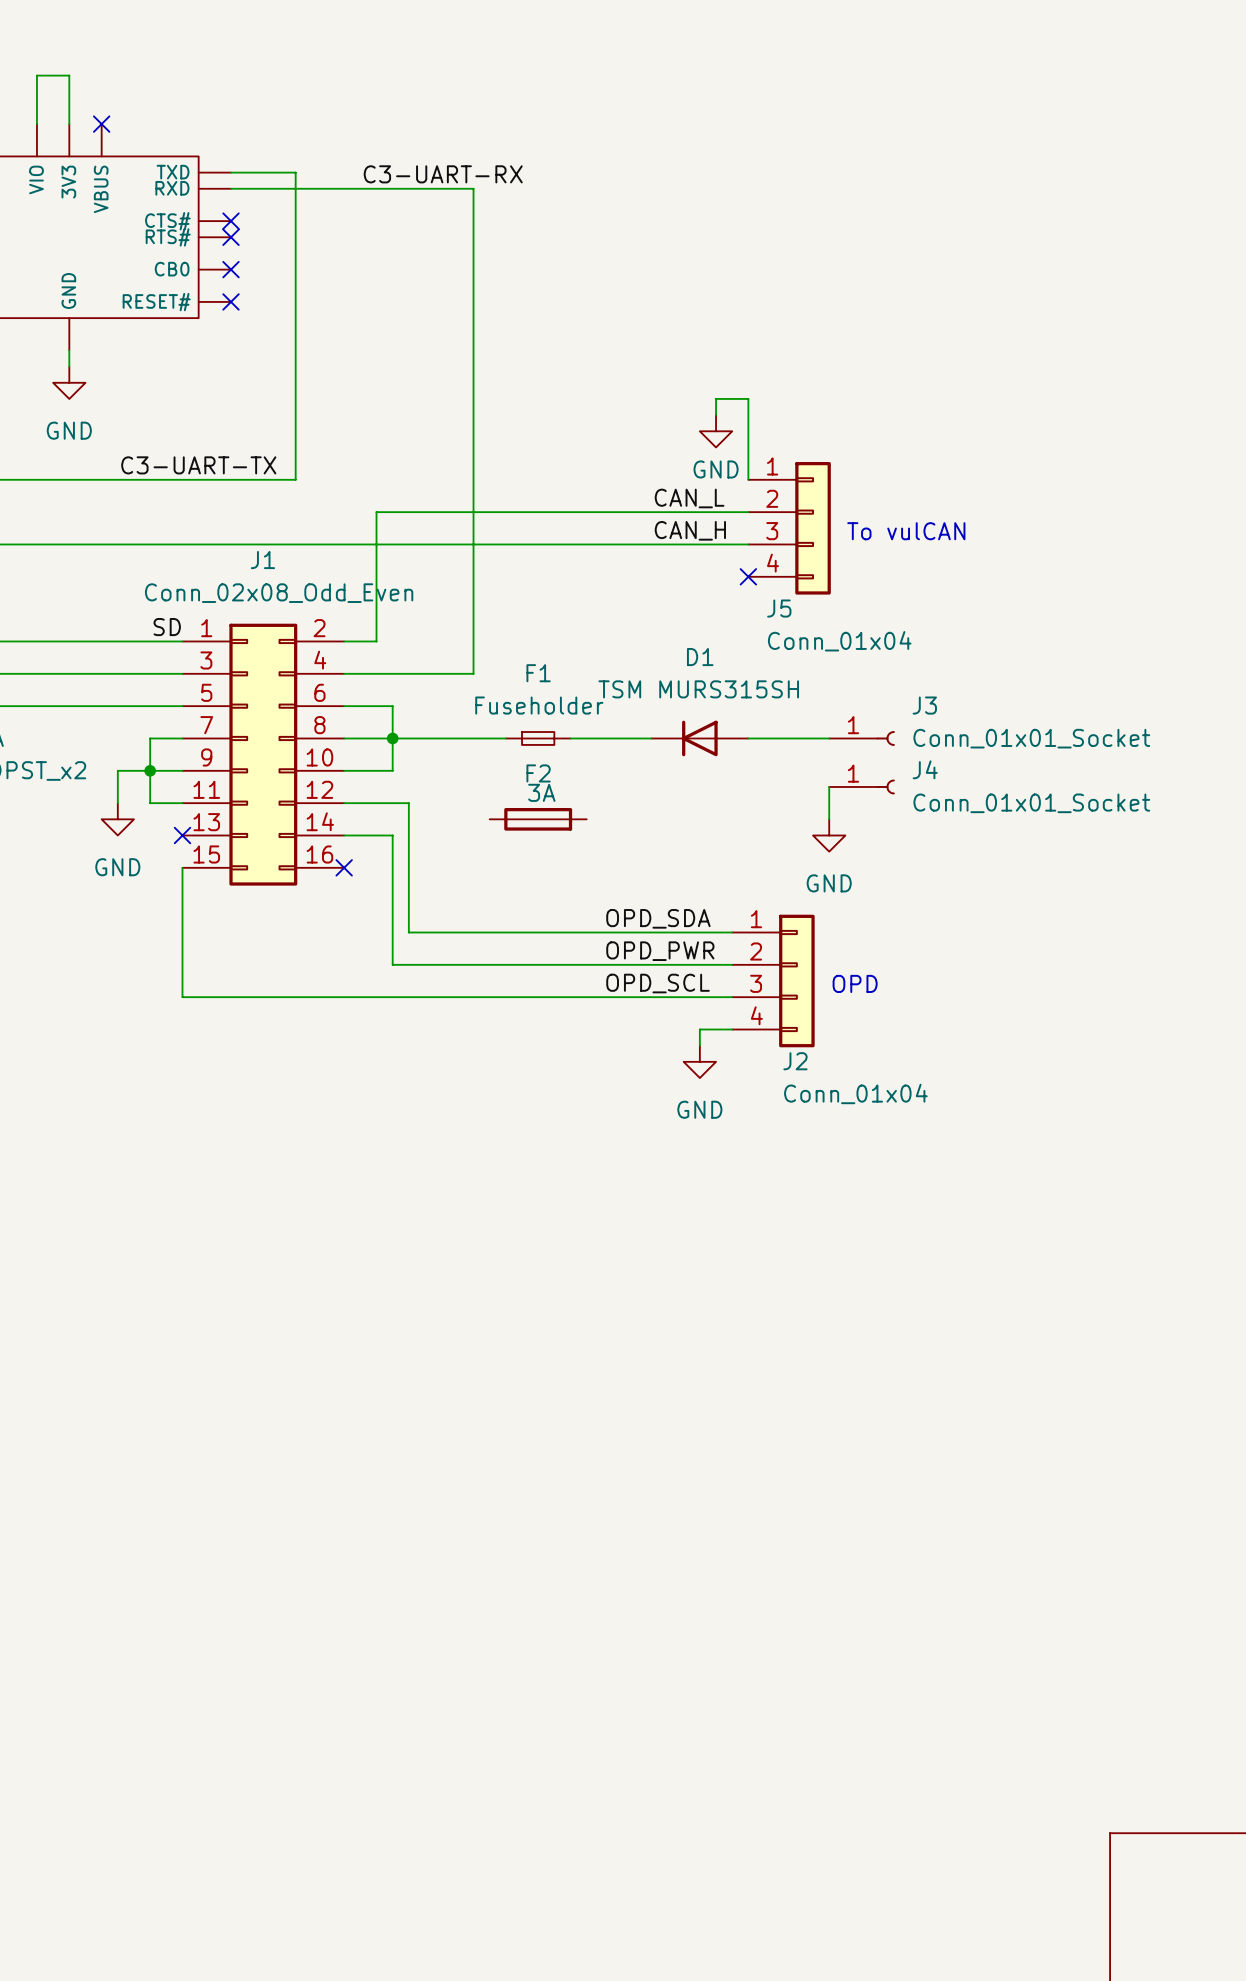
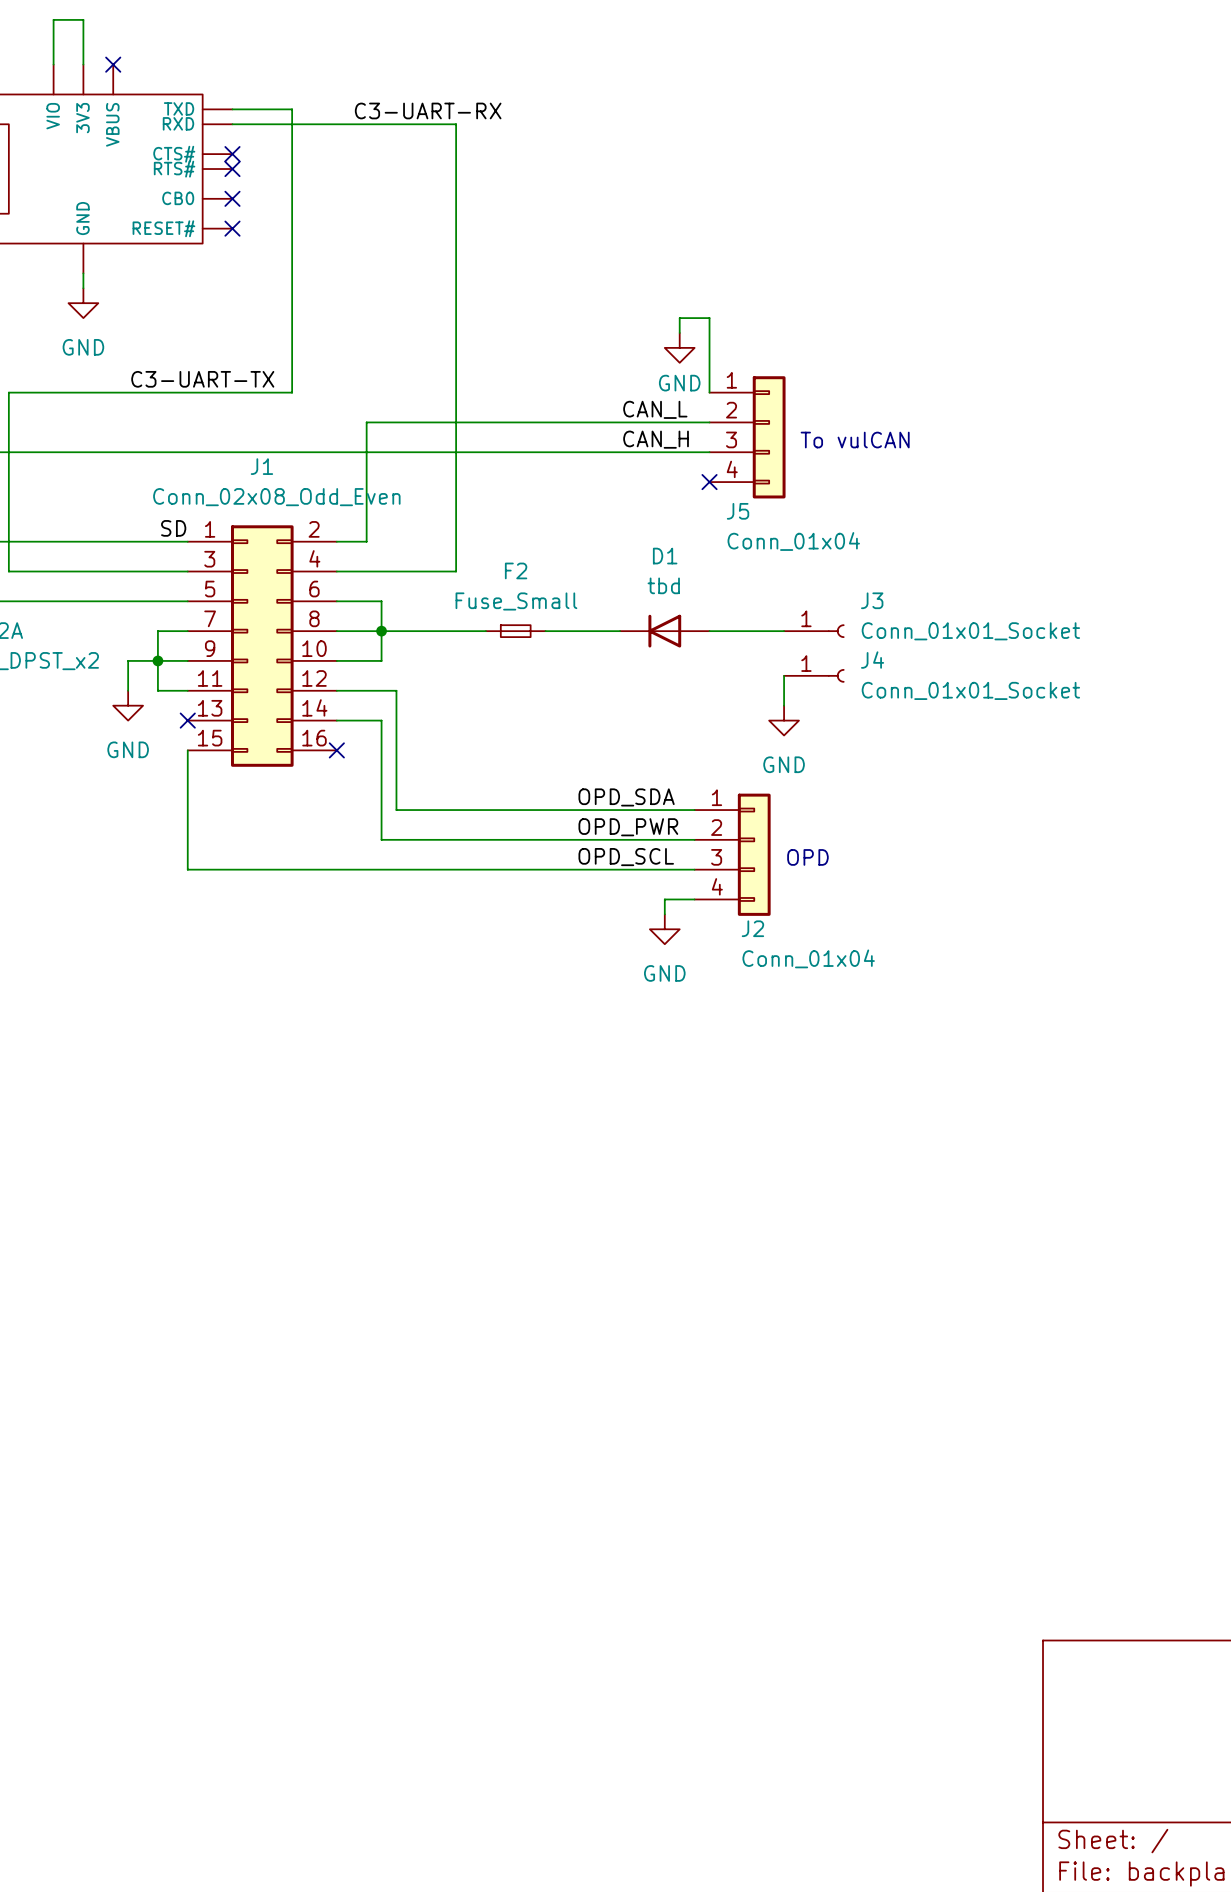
F1 name: F1 (538, 673) -> F2 (516, 570)
D1 value: TSM MURS315SH (698, 689) -> tbd (663, 585)
F1 value: Fuseholder (539, 705) -> Fuse_Small (516, 601)
F2: 3A (538, 819) -> none

